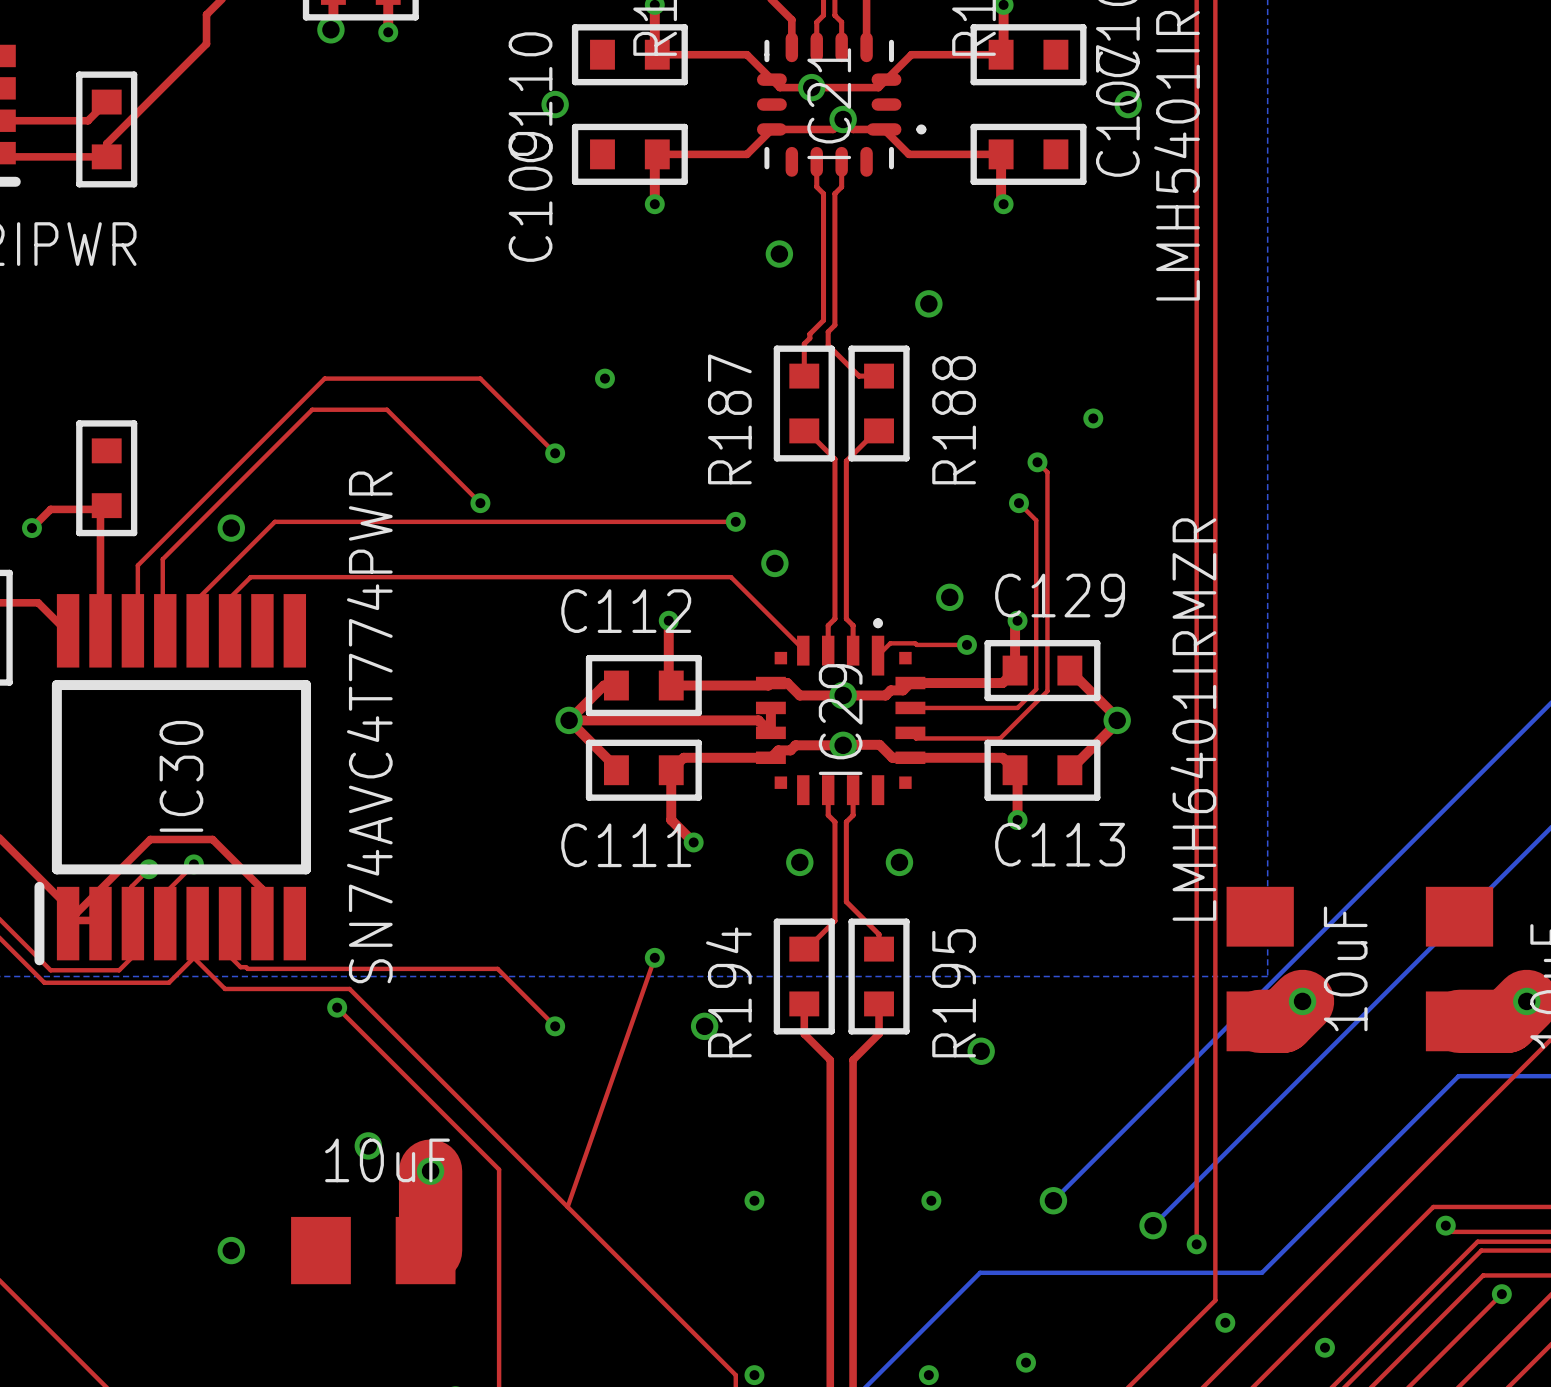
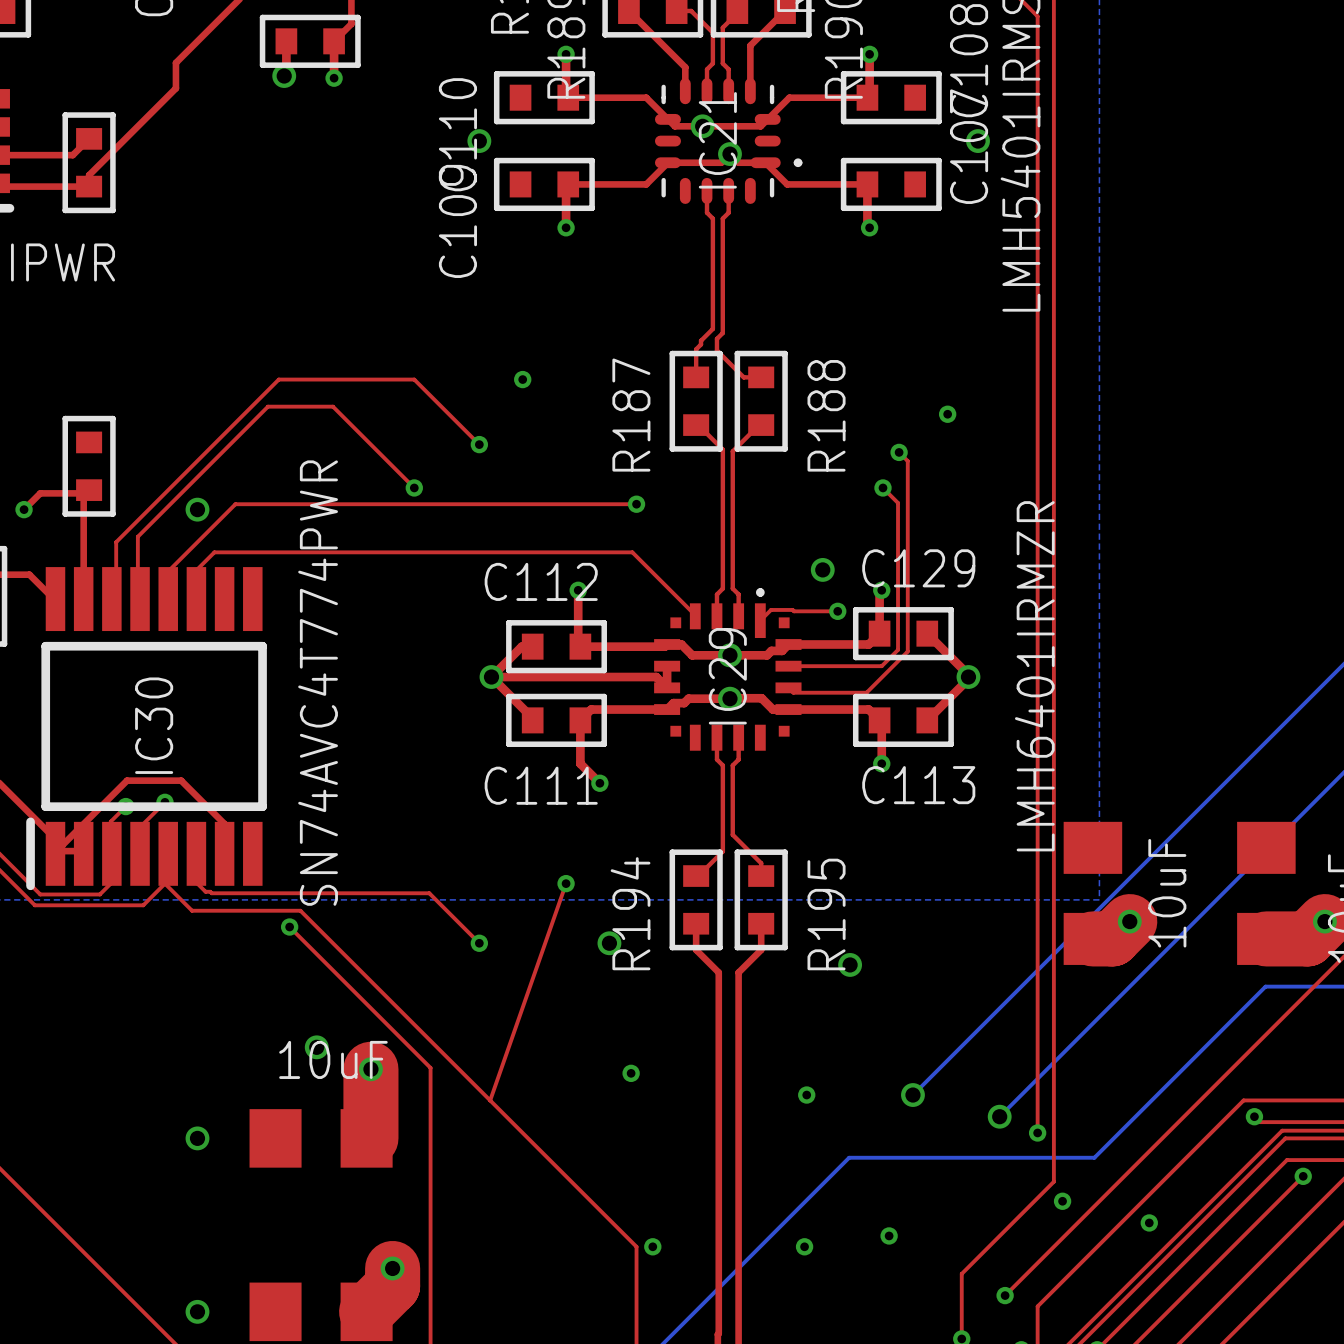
via: (779, 254) -> none
via: (928, 303) -> none
via: (774, 563) -> none
via: (799, 862) -> none
via: (899, 862) -> none
via position: (754, 1200) -> (631, 1073)

